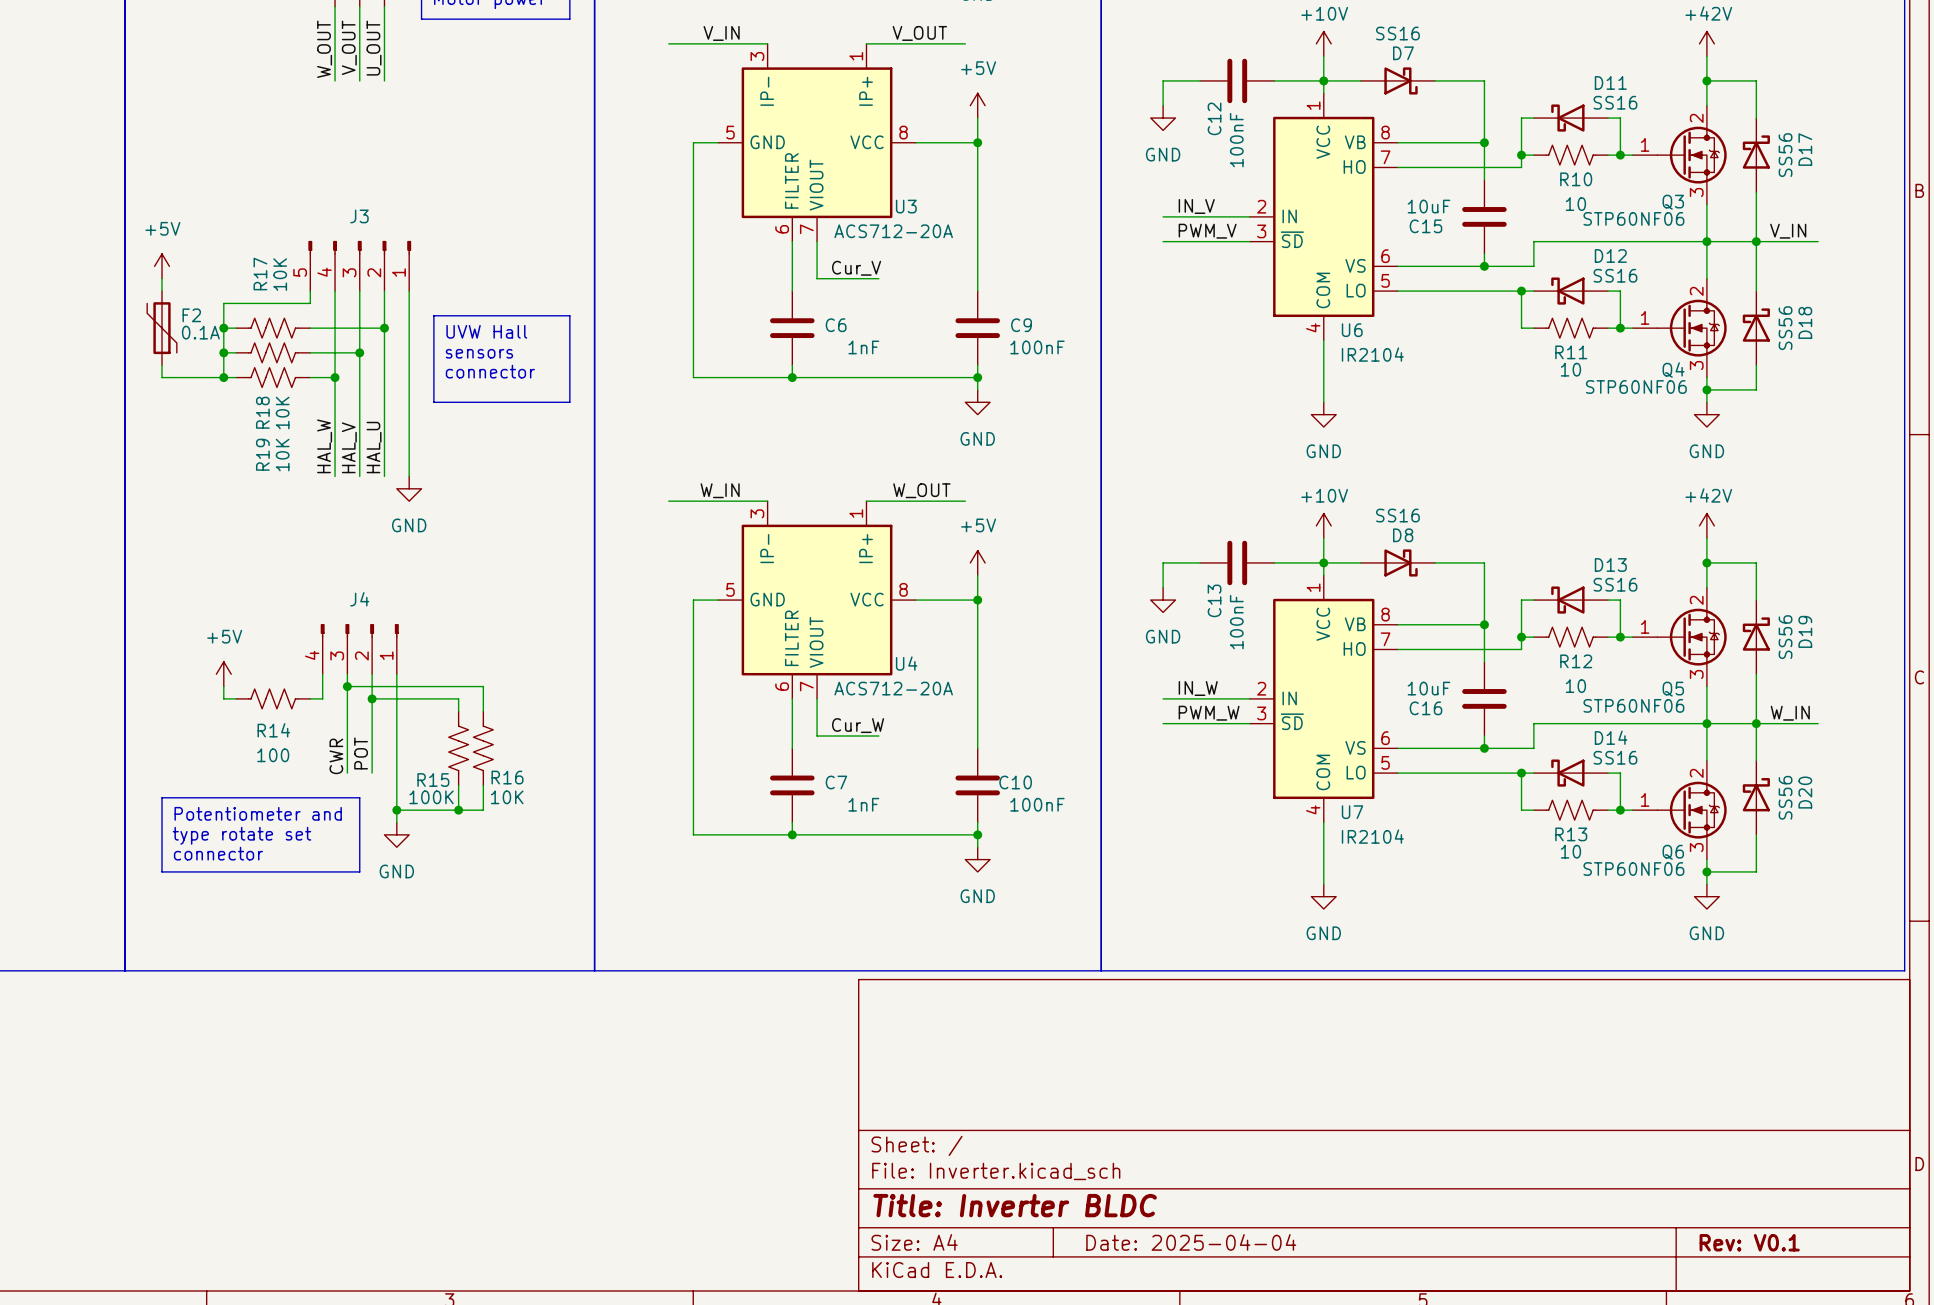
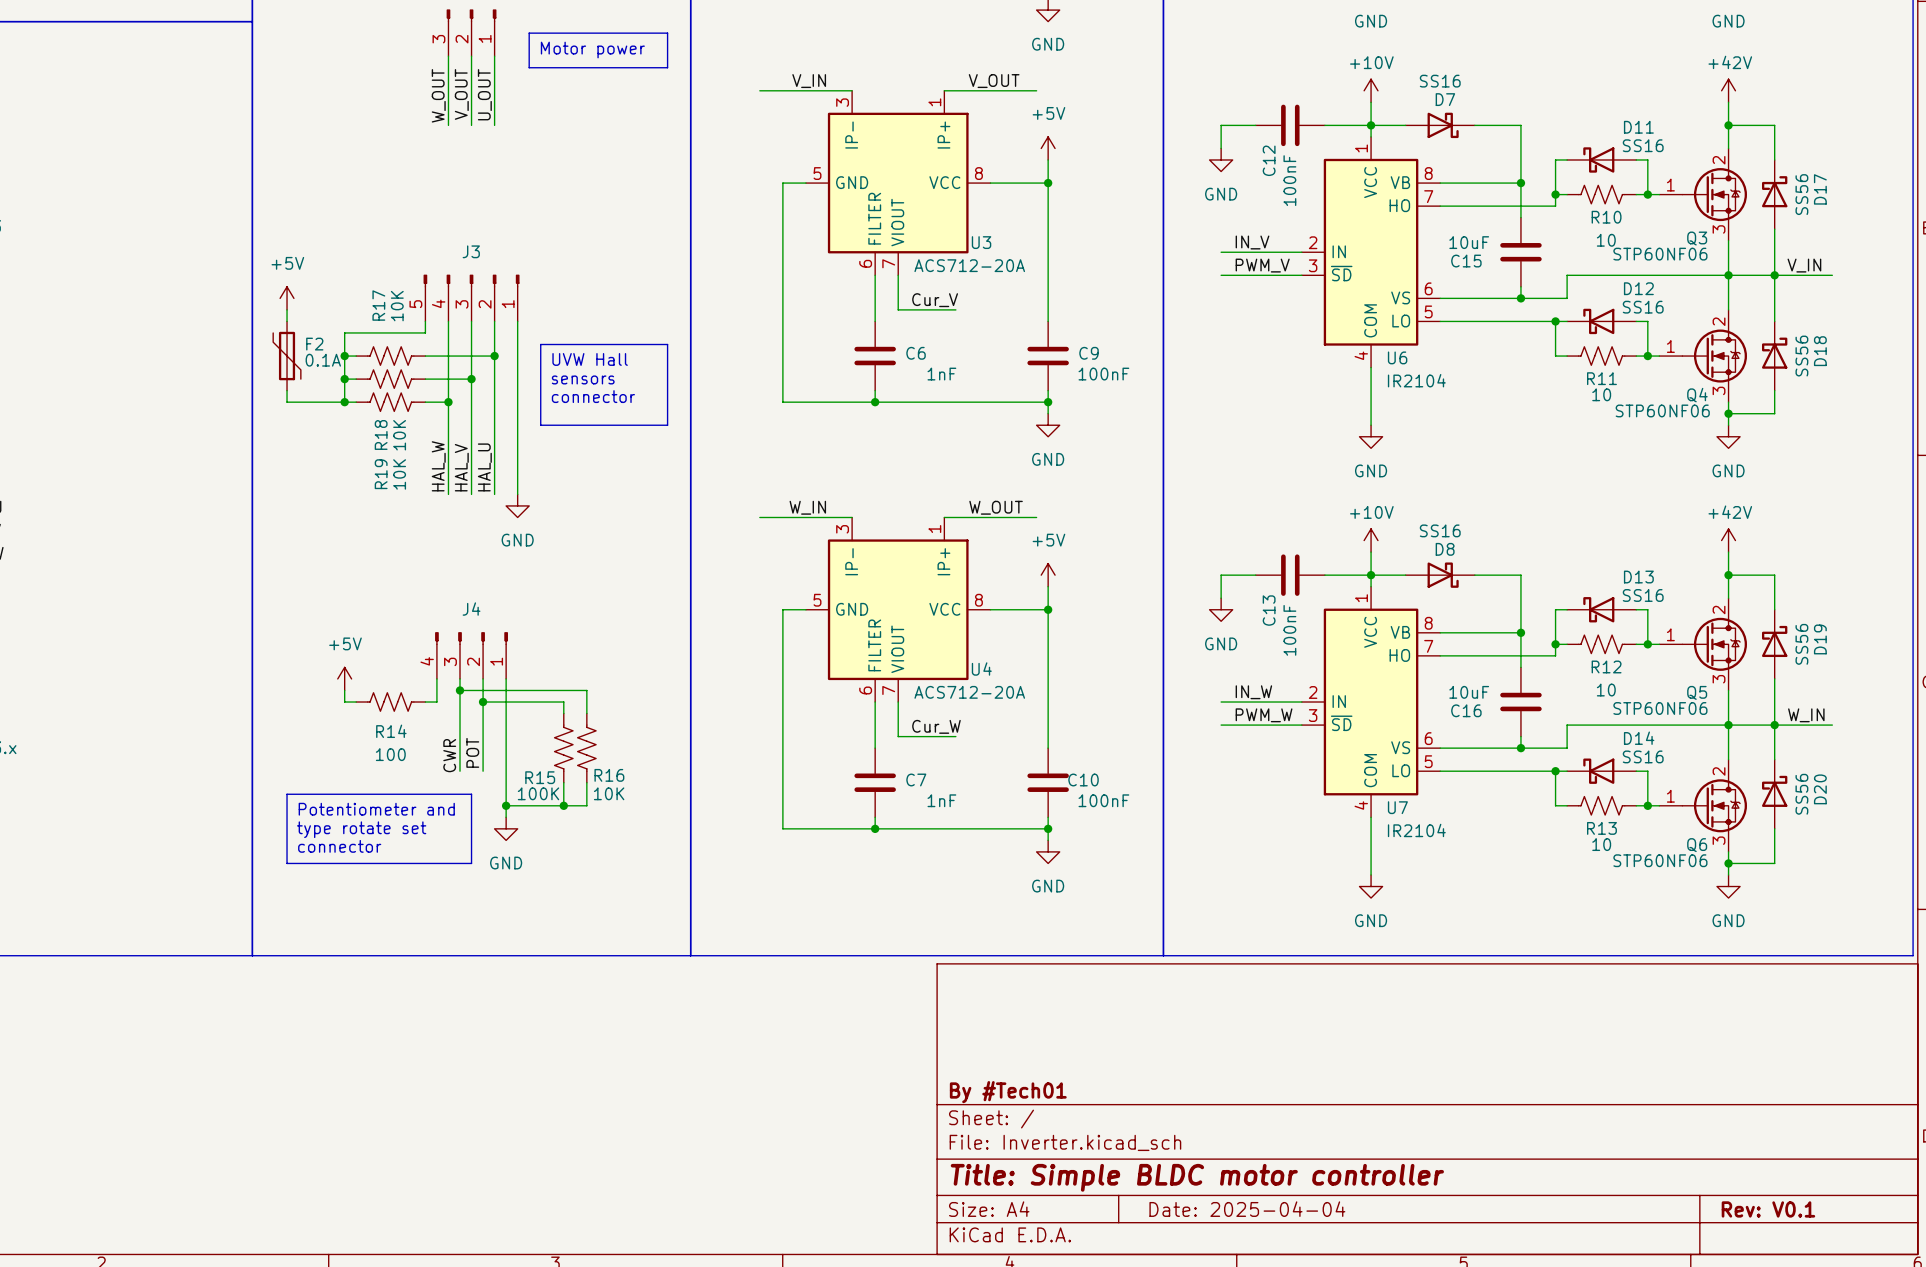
title block: none -> By #Tech01 (1008, 1092)
title block: Title: Inverter BLDC (1015, 1205) -> Title: Simple BLDC motor controller (1197, 1177)

